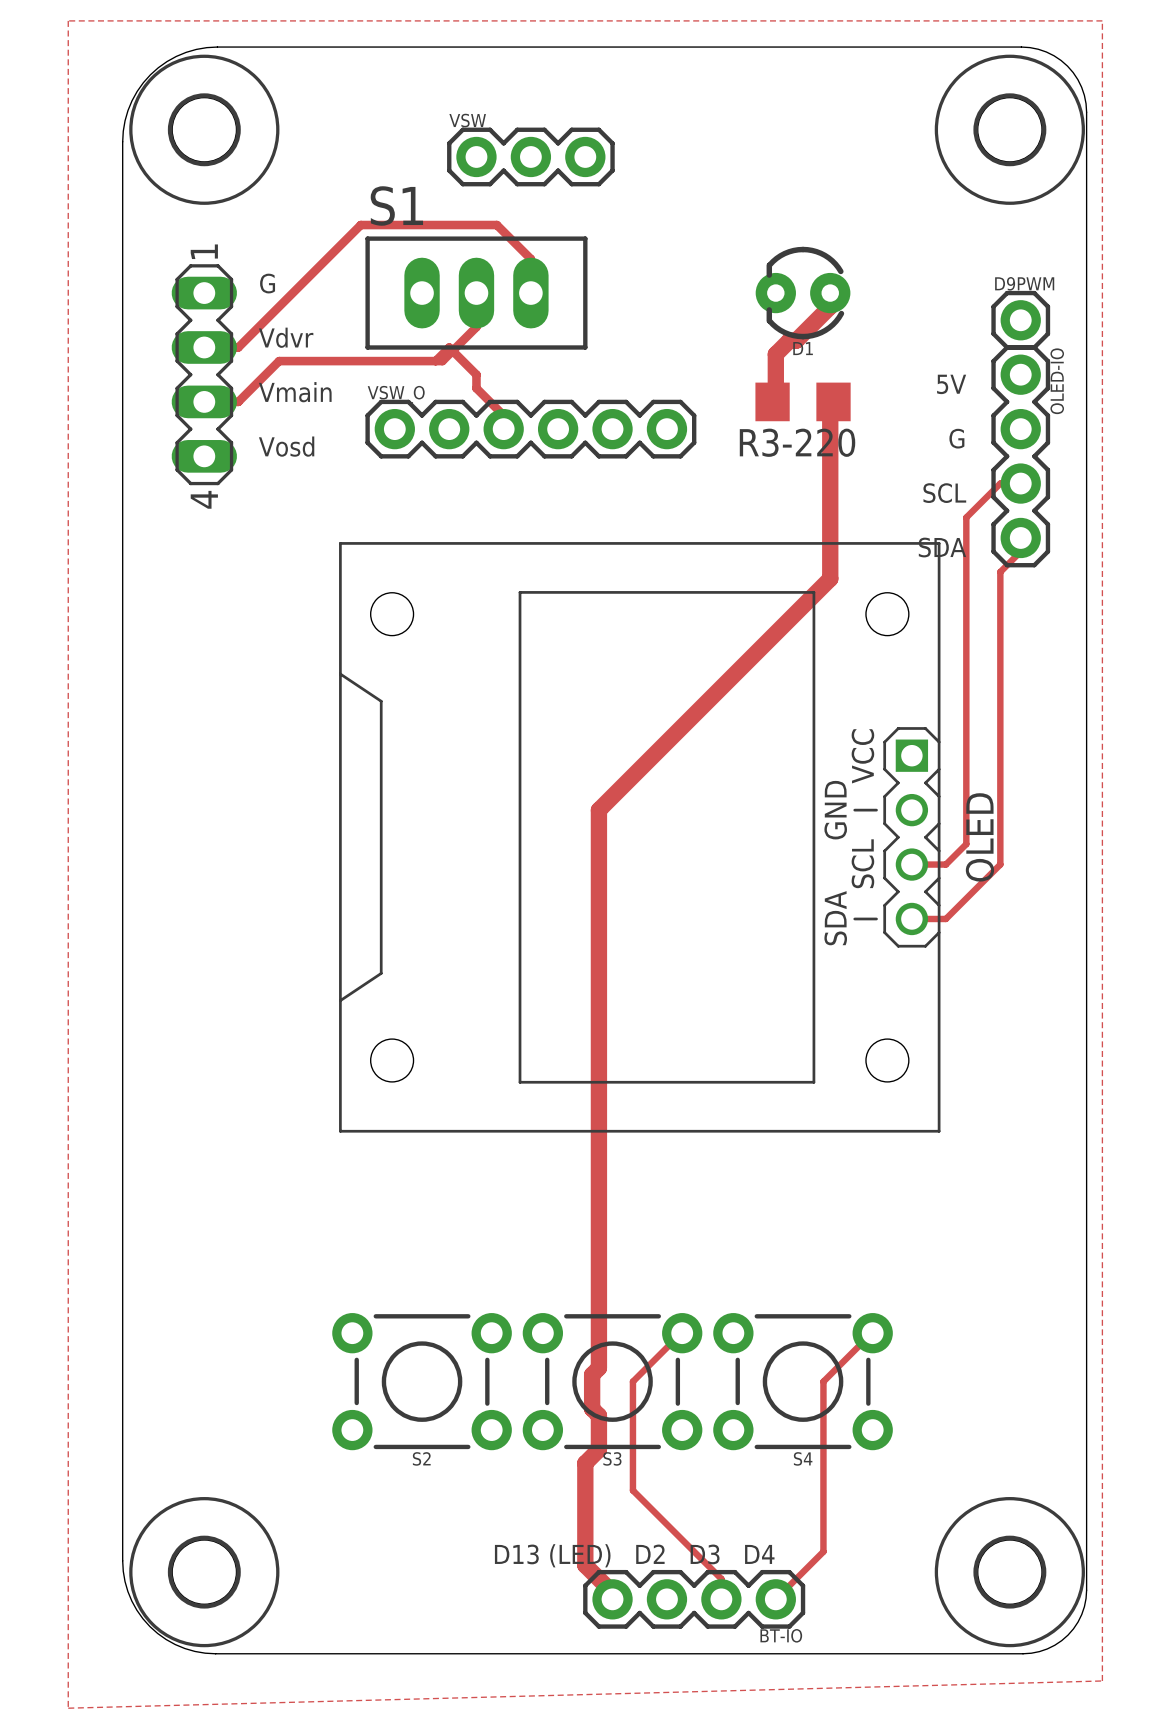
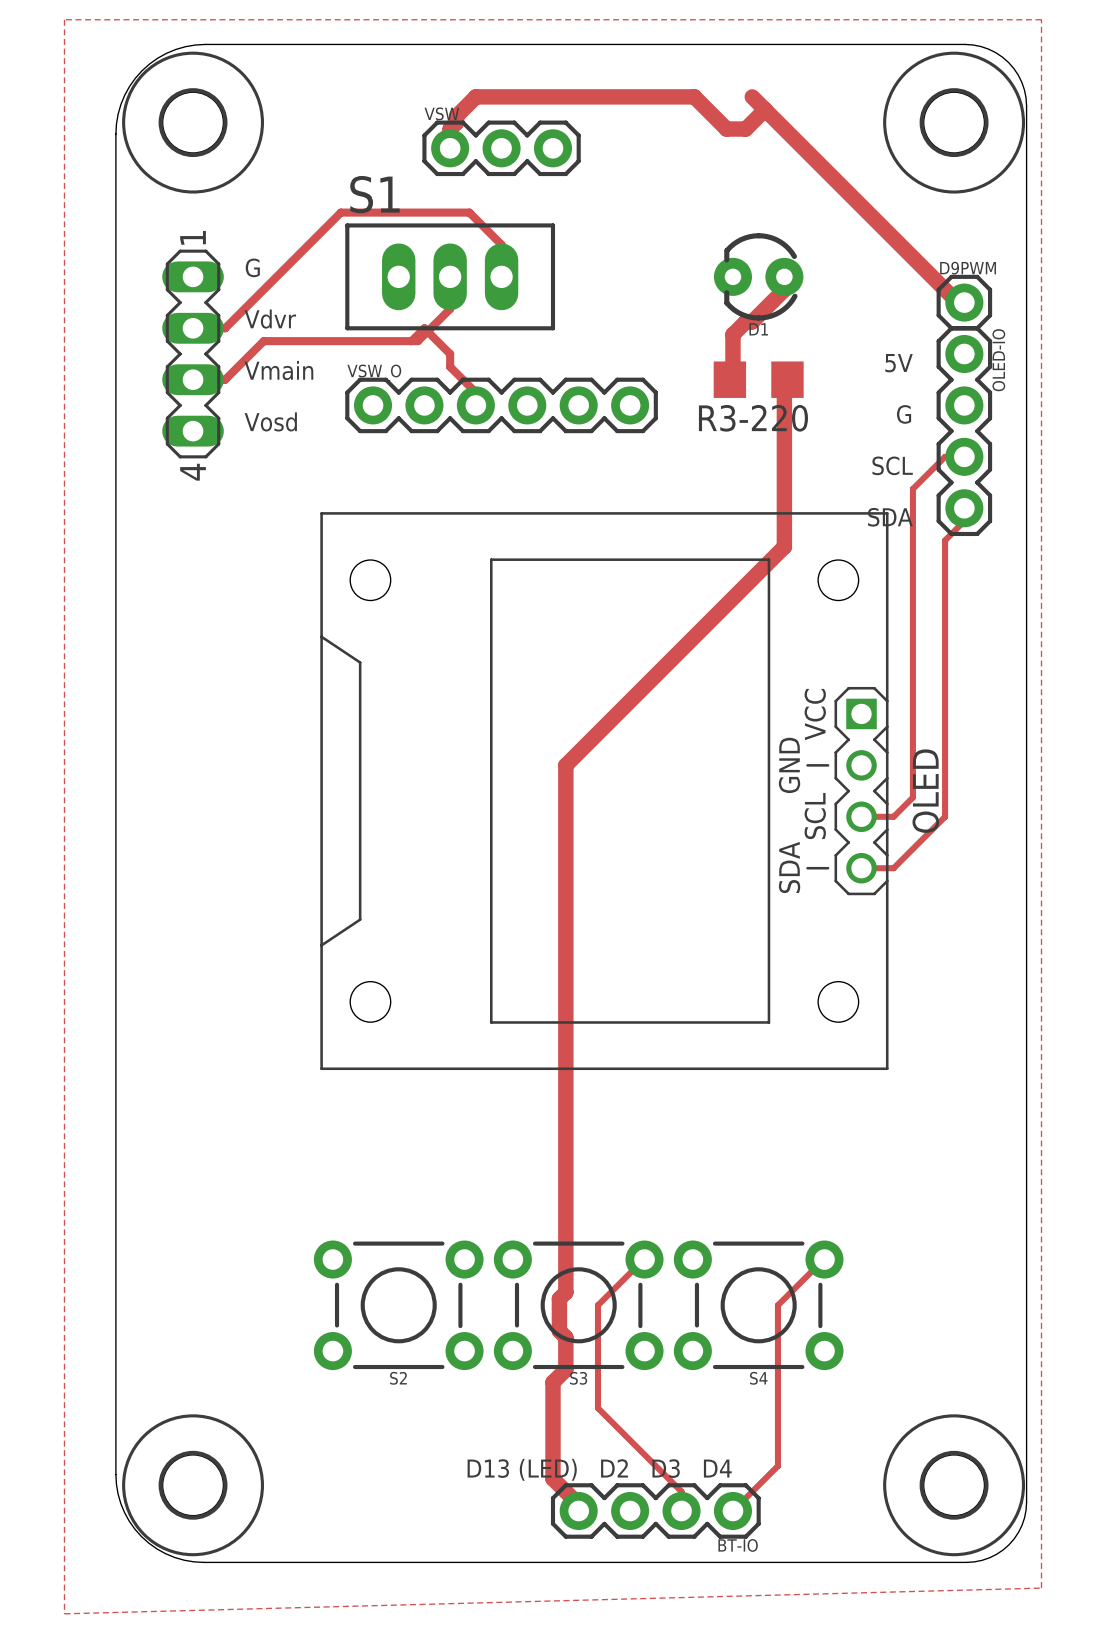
track: none -> (752, 96) (957, 302)
track: none -> (765, 109) (745, 129) (726, 129) (694, 96) (475, 96) (456, 116) (456, 122) (450, 129) (450, 148)

